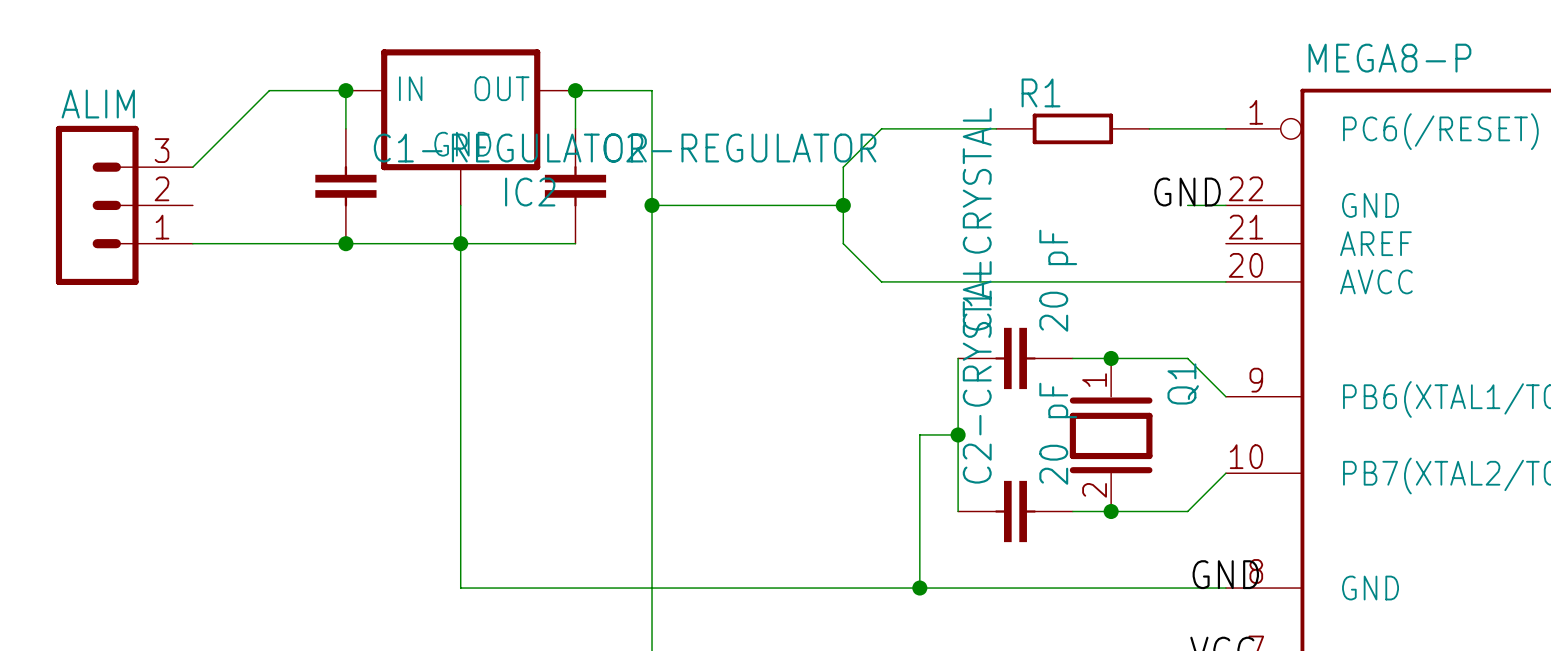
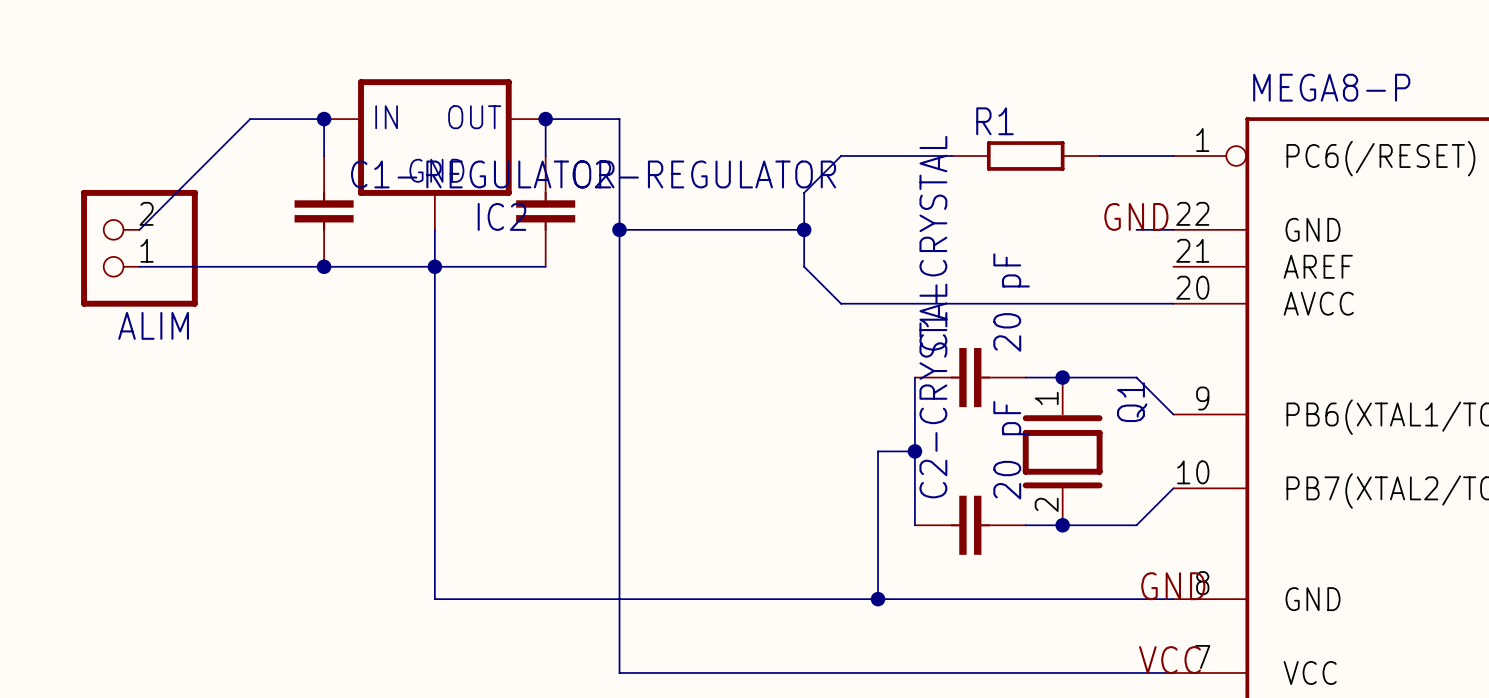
wire: none -> (176, 192) (139, 229)
ALIM: (124, 205) -> none
ALIM: none -> (139, 248)

